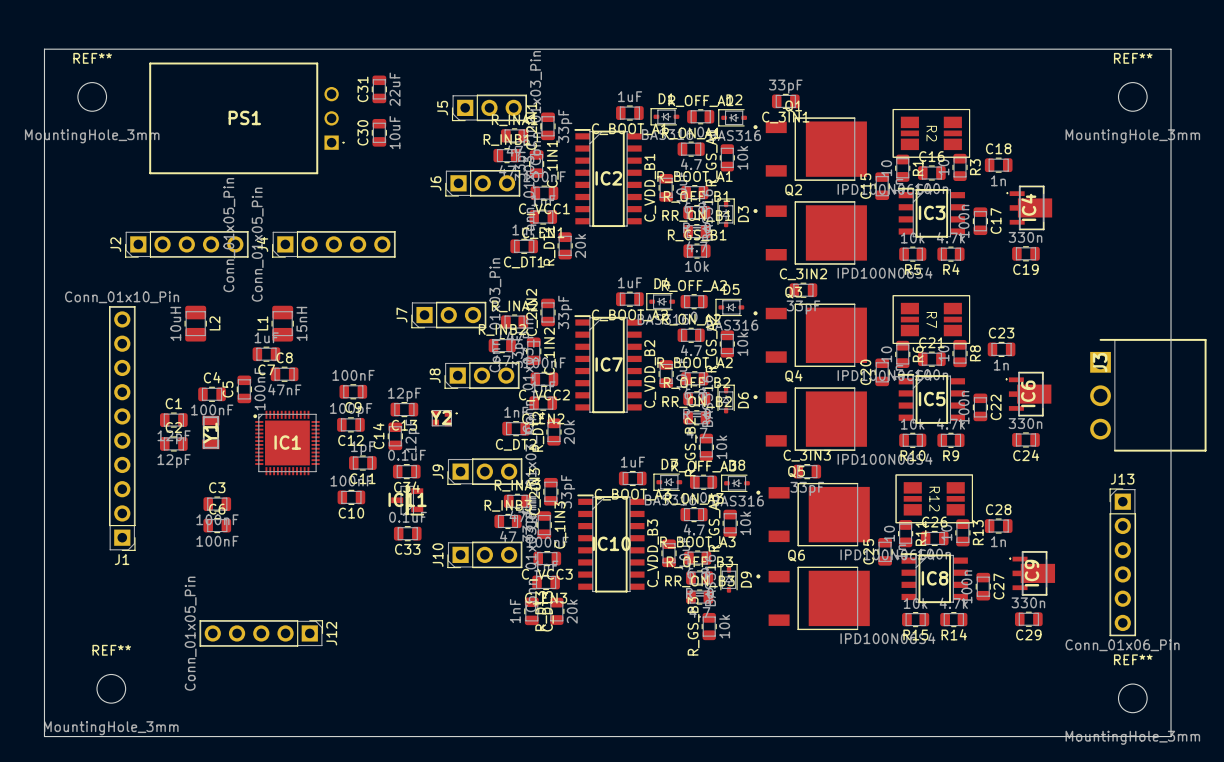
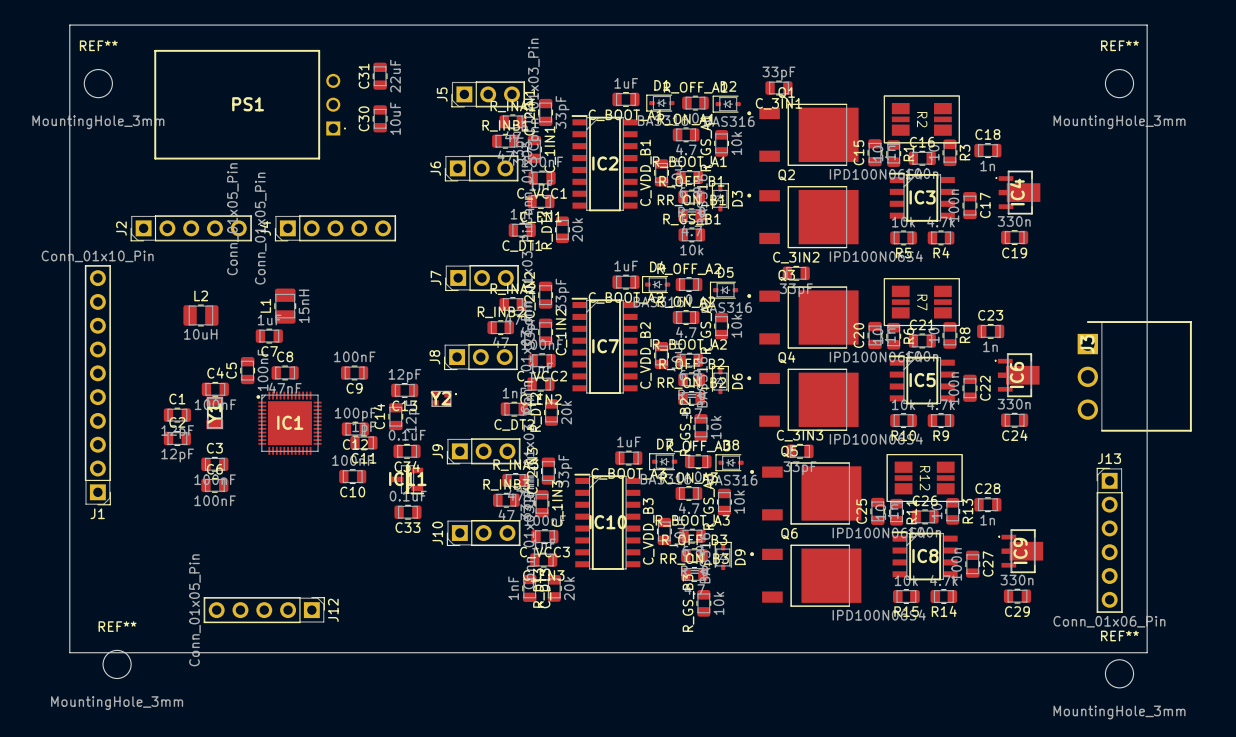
board edge: (44, 49) (1171, 49) (1171, 736) (44, 736) (44, 49) -> (69, 25) (69, 652) (1147, 652) (1147, 25) (69, 25)
C15 position: (882, 186) -> (874, 152)
J7 position: (448, 315) -> (481, 278)
L2 value position: 10uH (175, 323) -> 10uH (200, 334)
L2 rotation: 0° (195, 323) -> 90° clockwise (200, 315)
L2 name position: L2 (214, 323) -> L2 (201, 295)
C_1IN2 position: (533, 351) -> (545, 332)
C20 position: (882, 372) -> (874, 335)
C8 position: (284, 374) -> (285, 372)
C4 position: (212, 394) -> (215, 389)
C1 position: (173, 420) -> (177, 415)
C12 position: (350, 424) -> (355, 429)
J1 position: (122, 428) -> (97, 385)
C2 position: (173, 443) -> (177, 438)
C3 position: (217, 504) -> (214, 464)
C6 position: (217, 525) -> (214, 485)
C25 position: (885, 551) -> (877, 511)

